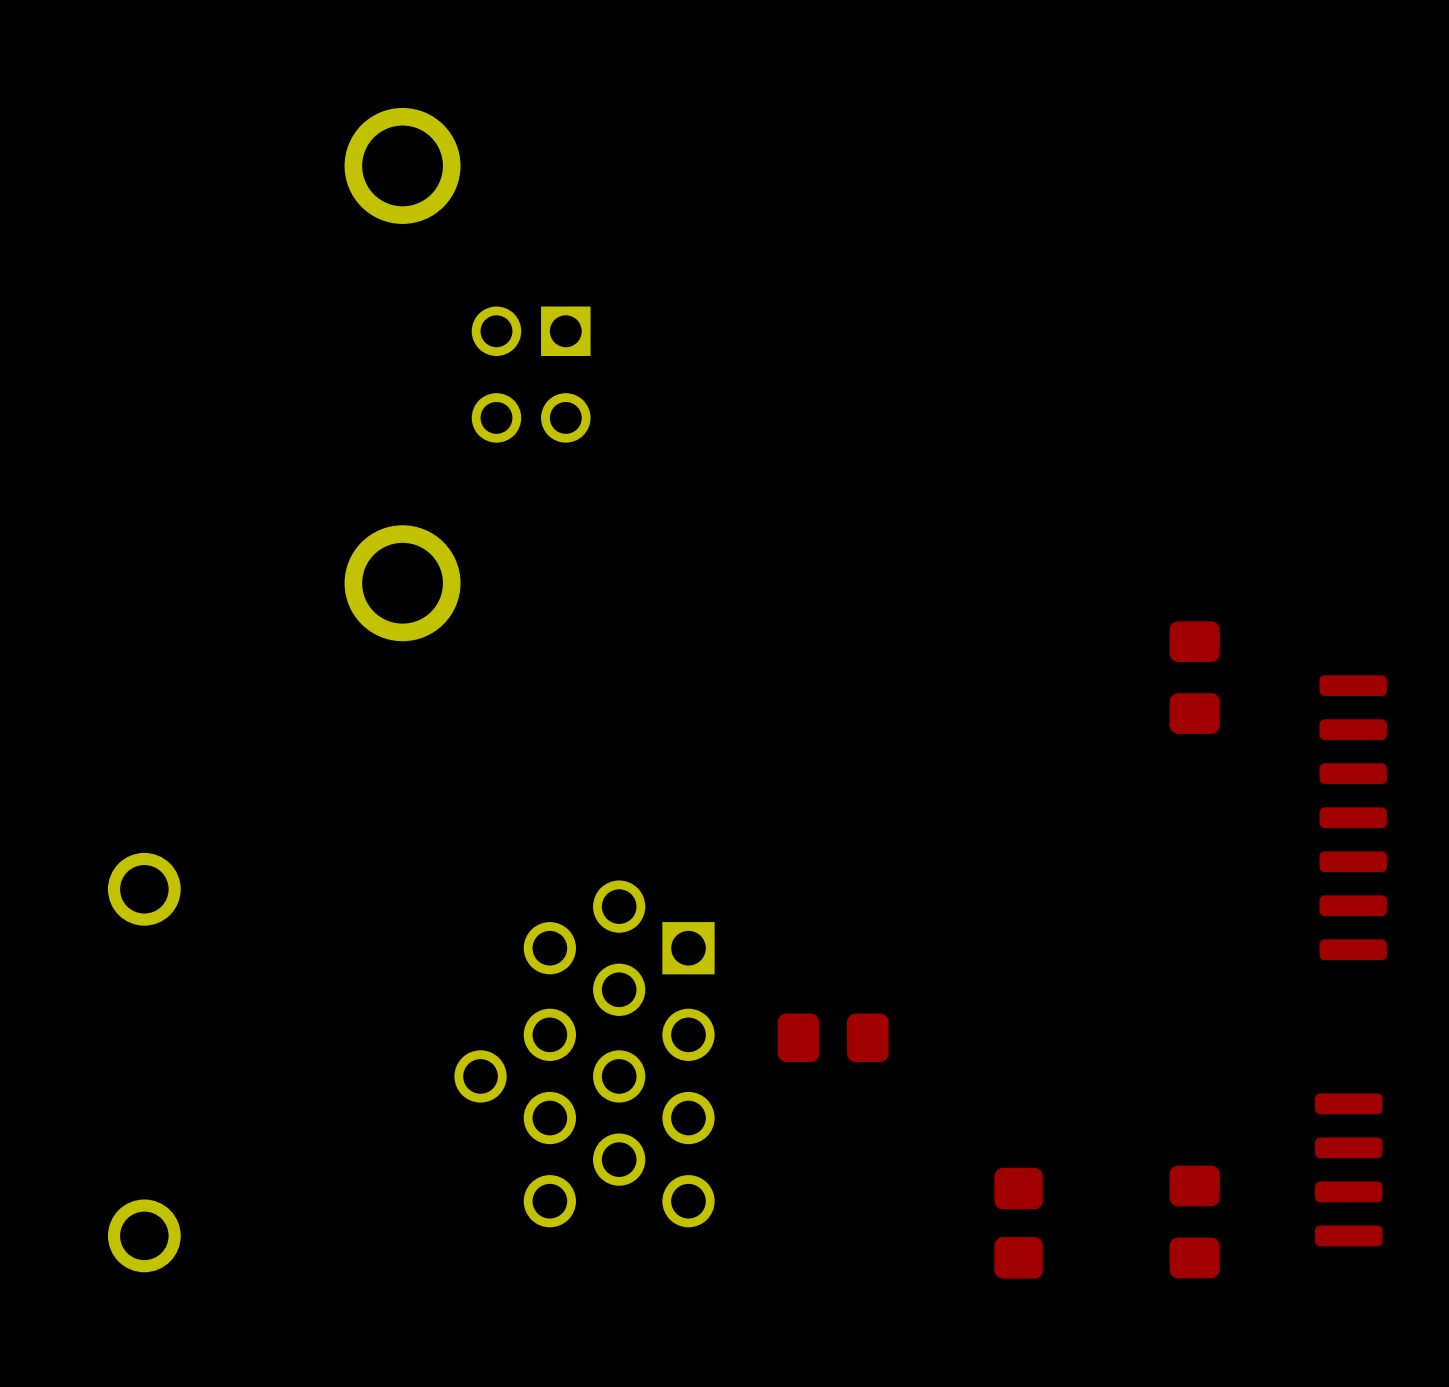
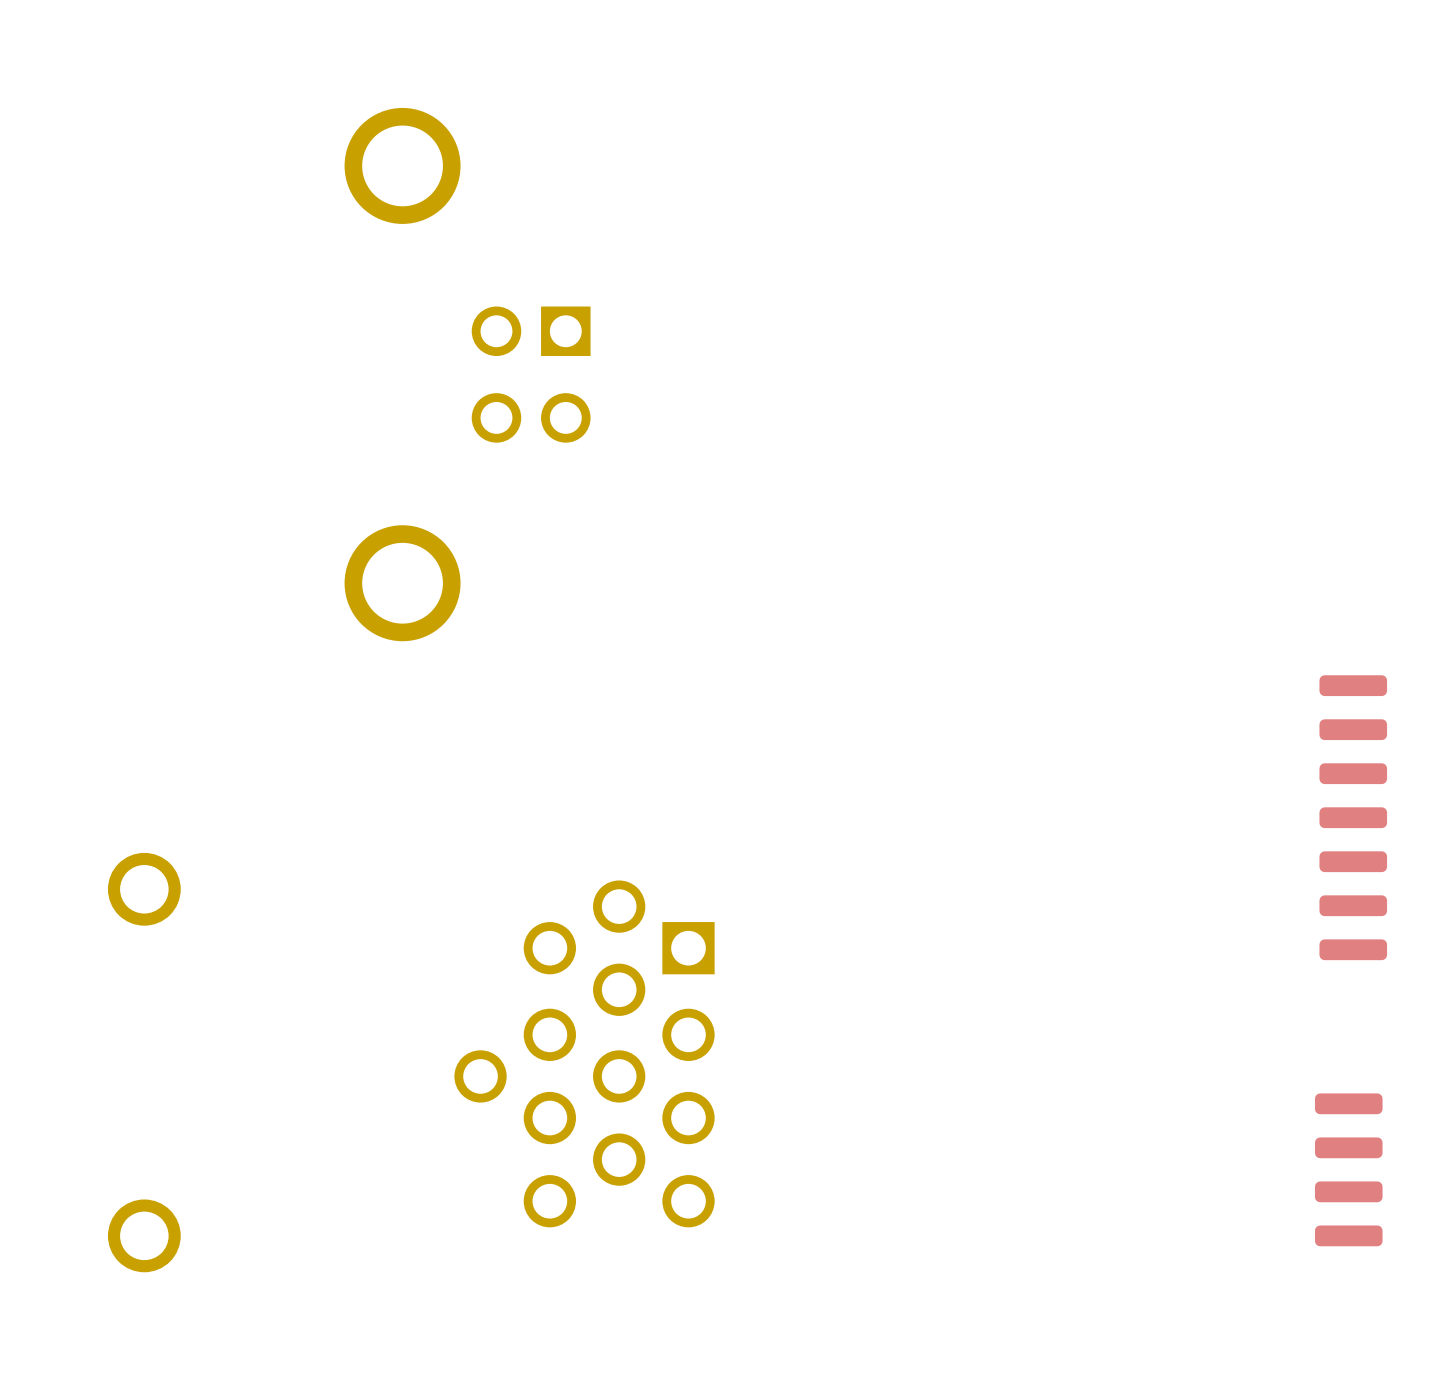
part: (1194, 677) -> none
part: (833, 1037) -> none
part: (1194, 1221) -> none
part: (1018, 1223) -> none

